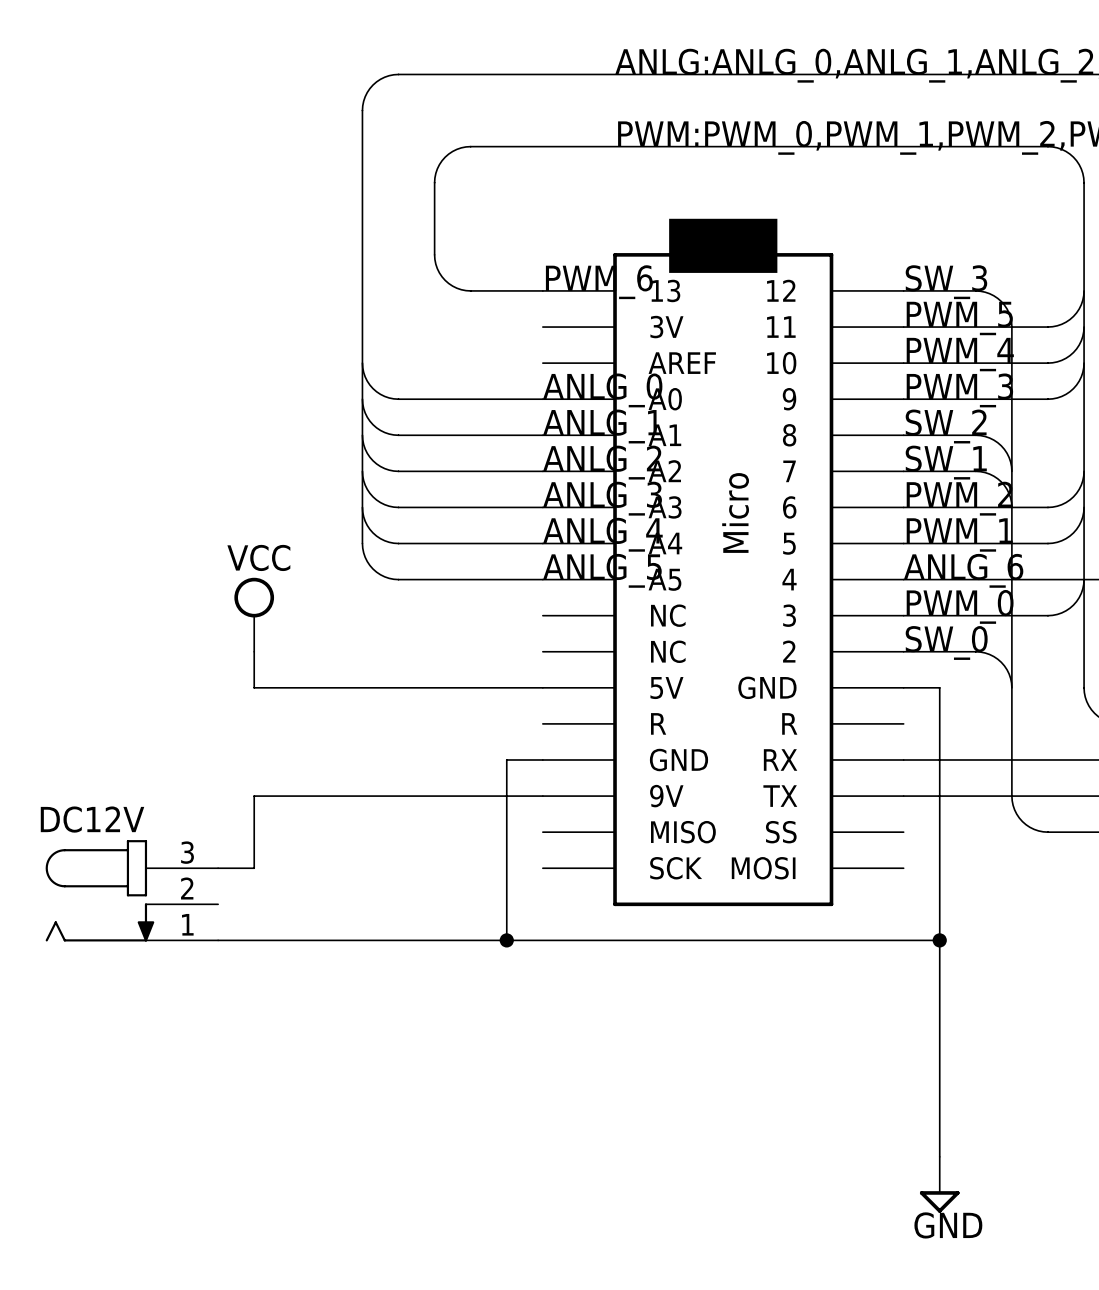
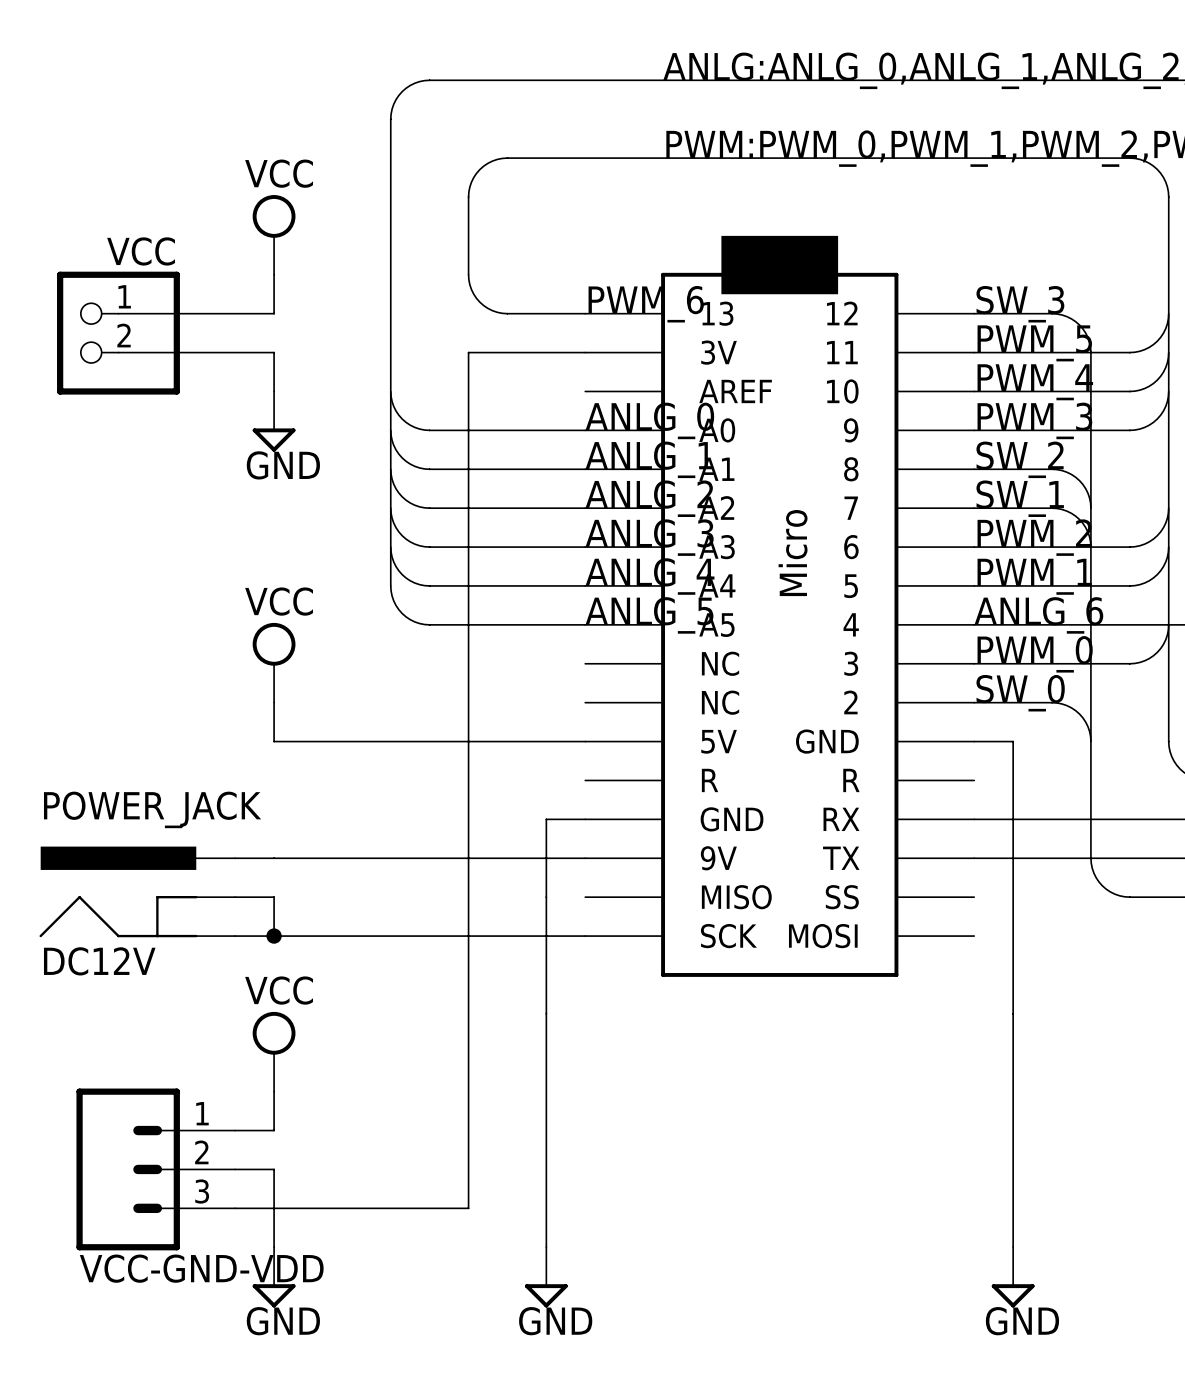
power symbol: none -> VCC (274, 234)
wire: none -> (274, 274) (274, 313) (118, 313)
VCC: none -> (118, 333)
wire: none -> (118, 352) (274, 352) (274, 391)
wire: none -> (585, 352) (468, 352) (468, 1208) (235, 1208)
power symbol: none -> GND (274, 421)
DC12V value: none -> POWER_JACK (152, 809)
wire: (254, 796) (254, 832) -> (274, 858) (235, 858)
DC12V name position: DC12V (92, 819) -> DC12V (99, 961)
wire: none -> (235, 897) (274, 897)
DC12V symbol: [45, 840, 219, 942] -> [39, 846, 236, 938]
wire: none -> (274, 936) (585, 936)
junction: none -> (274, 936)
wire: (218, 940) (939, 940) -> none
wire: none -> (546, 1013) (546, 1247)
junction: (506, 940) -> none
junction: (939, 940) -> none
power symbol: none -> VCC (274, 1051)
wire: none -> (274, 1091) (274, 1130) (235, 1130)
VCC-GND-VDD: none -> (155, 1169)
wire: none -> (235, 1169) (274, 1169) (274, 1247)
power symbol: none -> GND (274, 1277)
power symbol: none -> GND (546, 1277)

